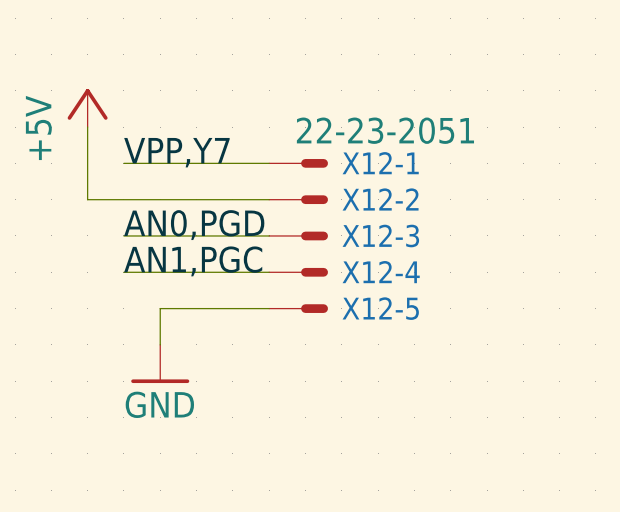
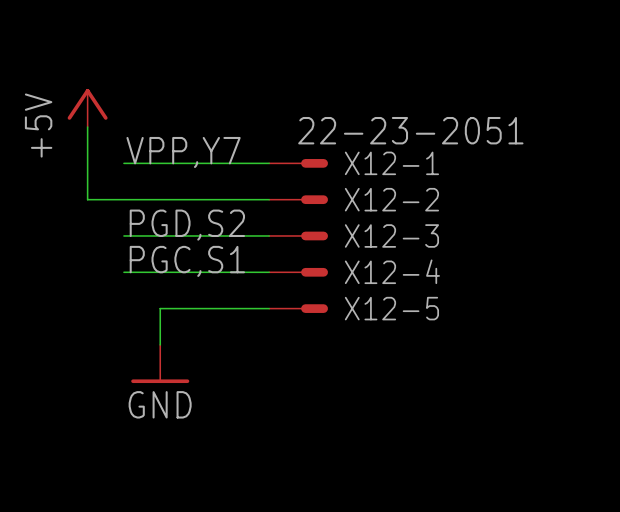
label: AN0,PGD (194, 225) -> PGD,S2 (187, 225)
label: AN1,PGC (193, 261) -> PGC,S1 (187, 261)

